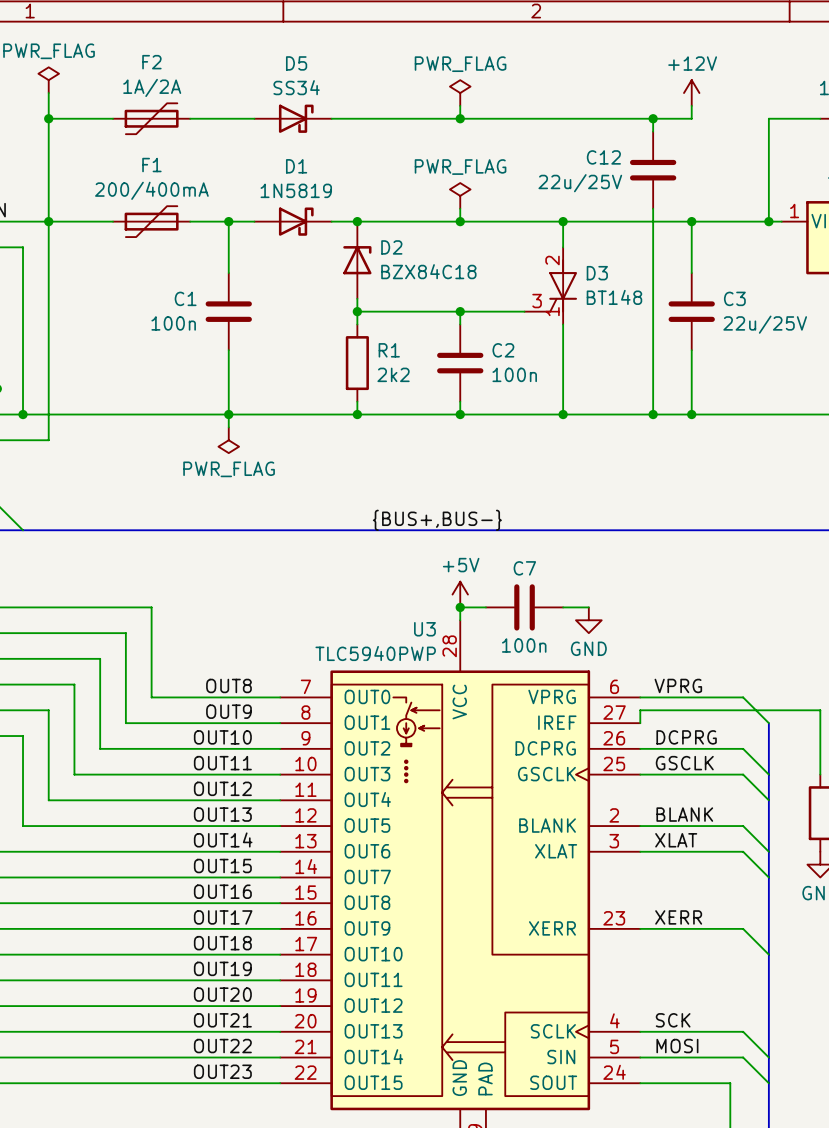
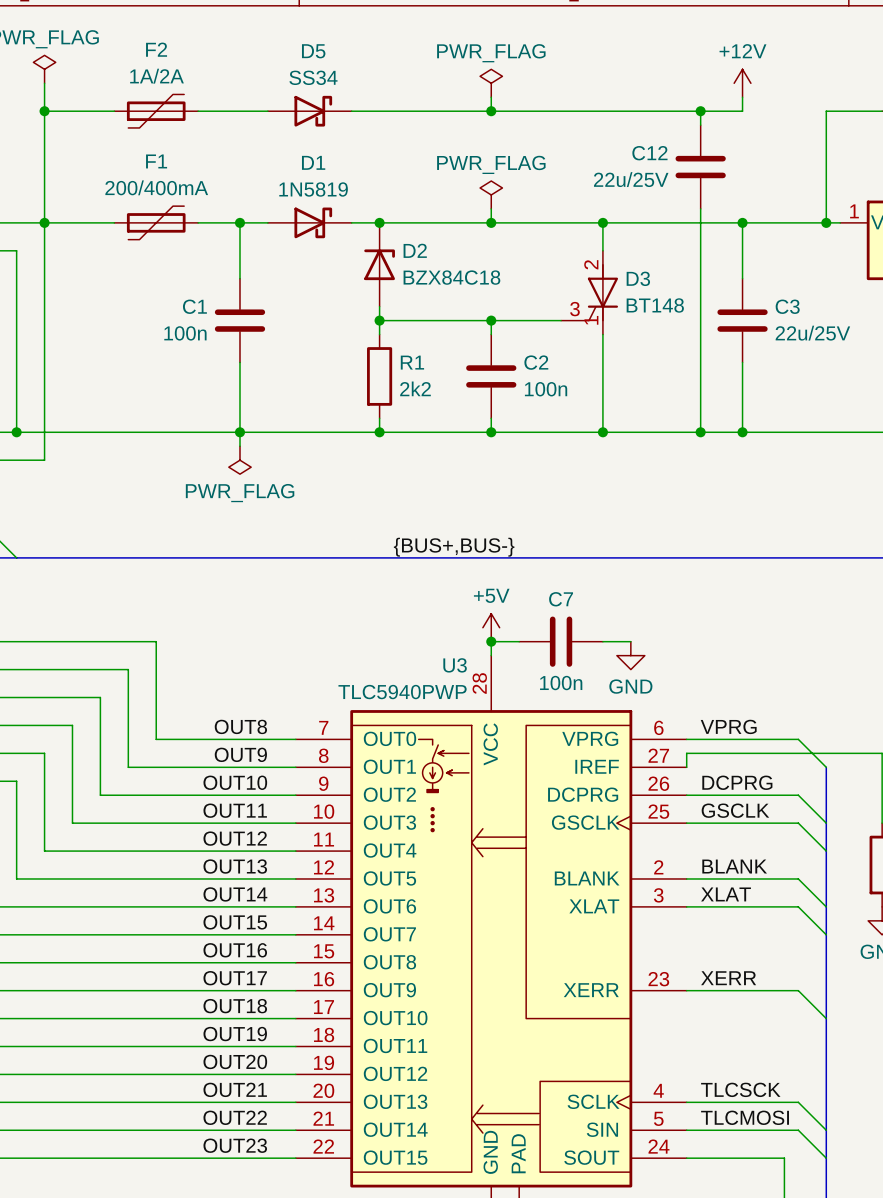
label: SCK (673, 1020) -> TLCSCK (740, 1089)
label: MOSI (677, 1046) -> TLCMOSI (745, 1117)

